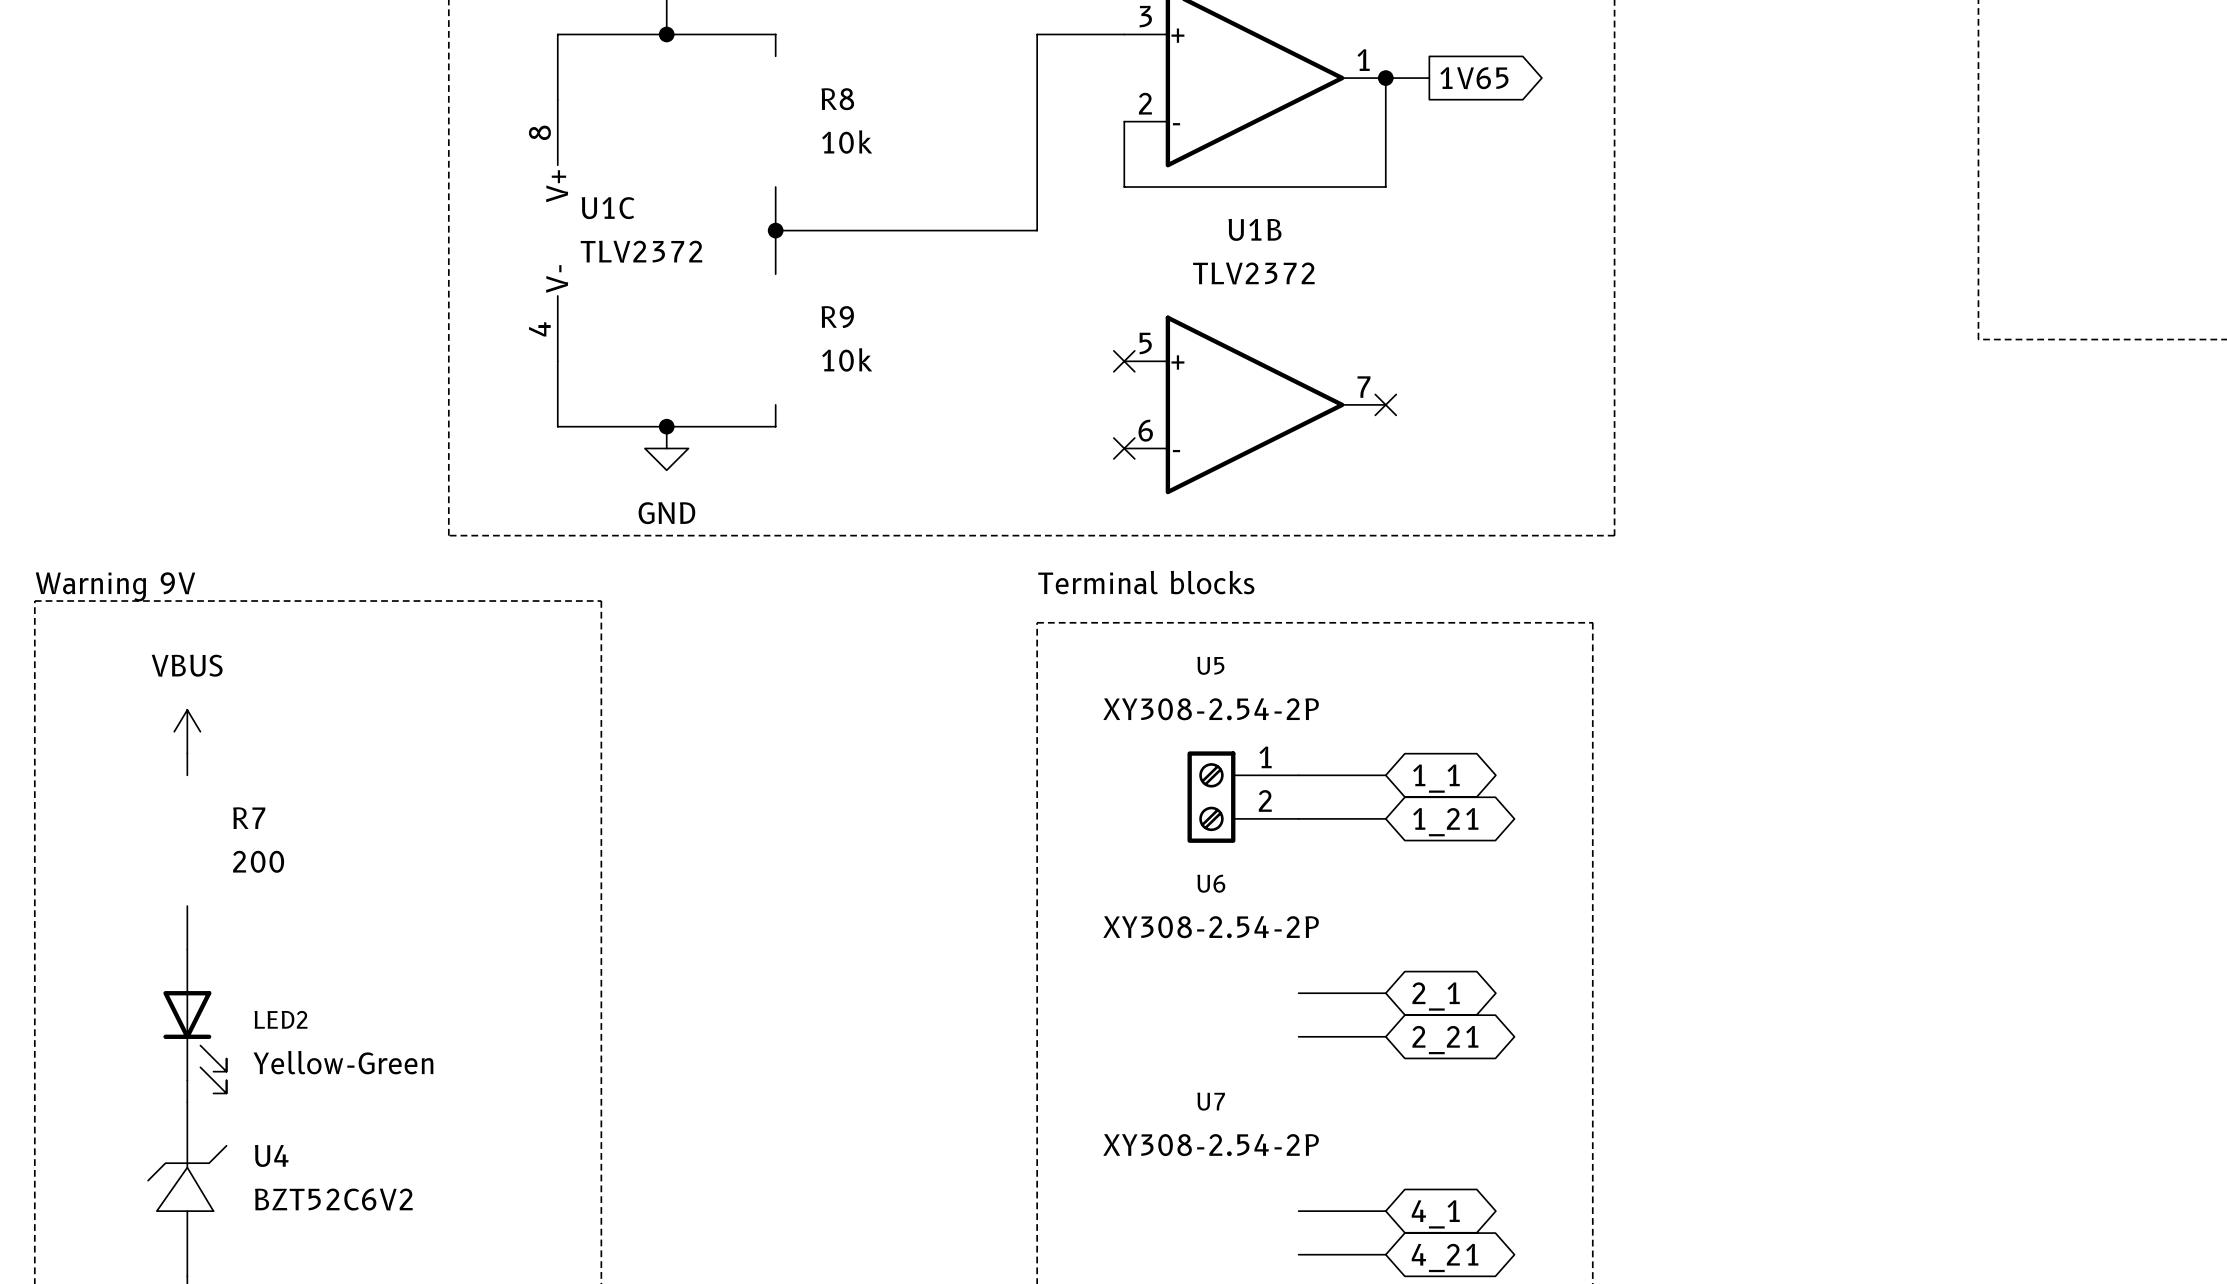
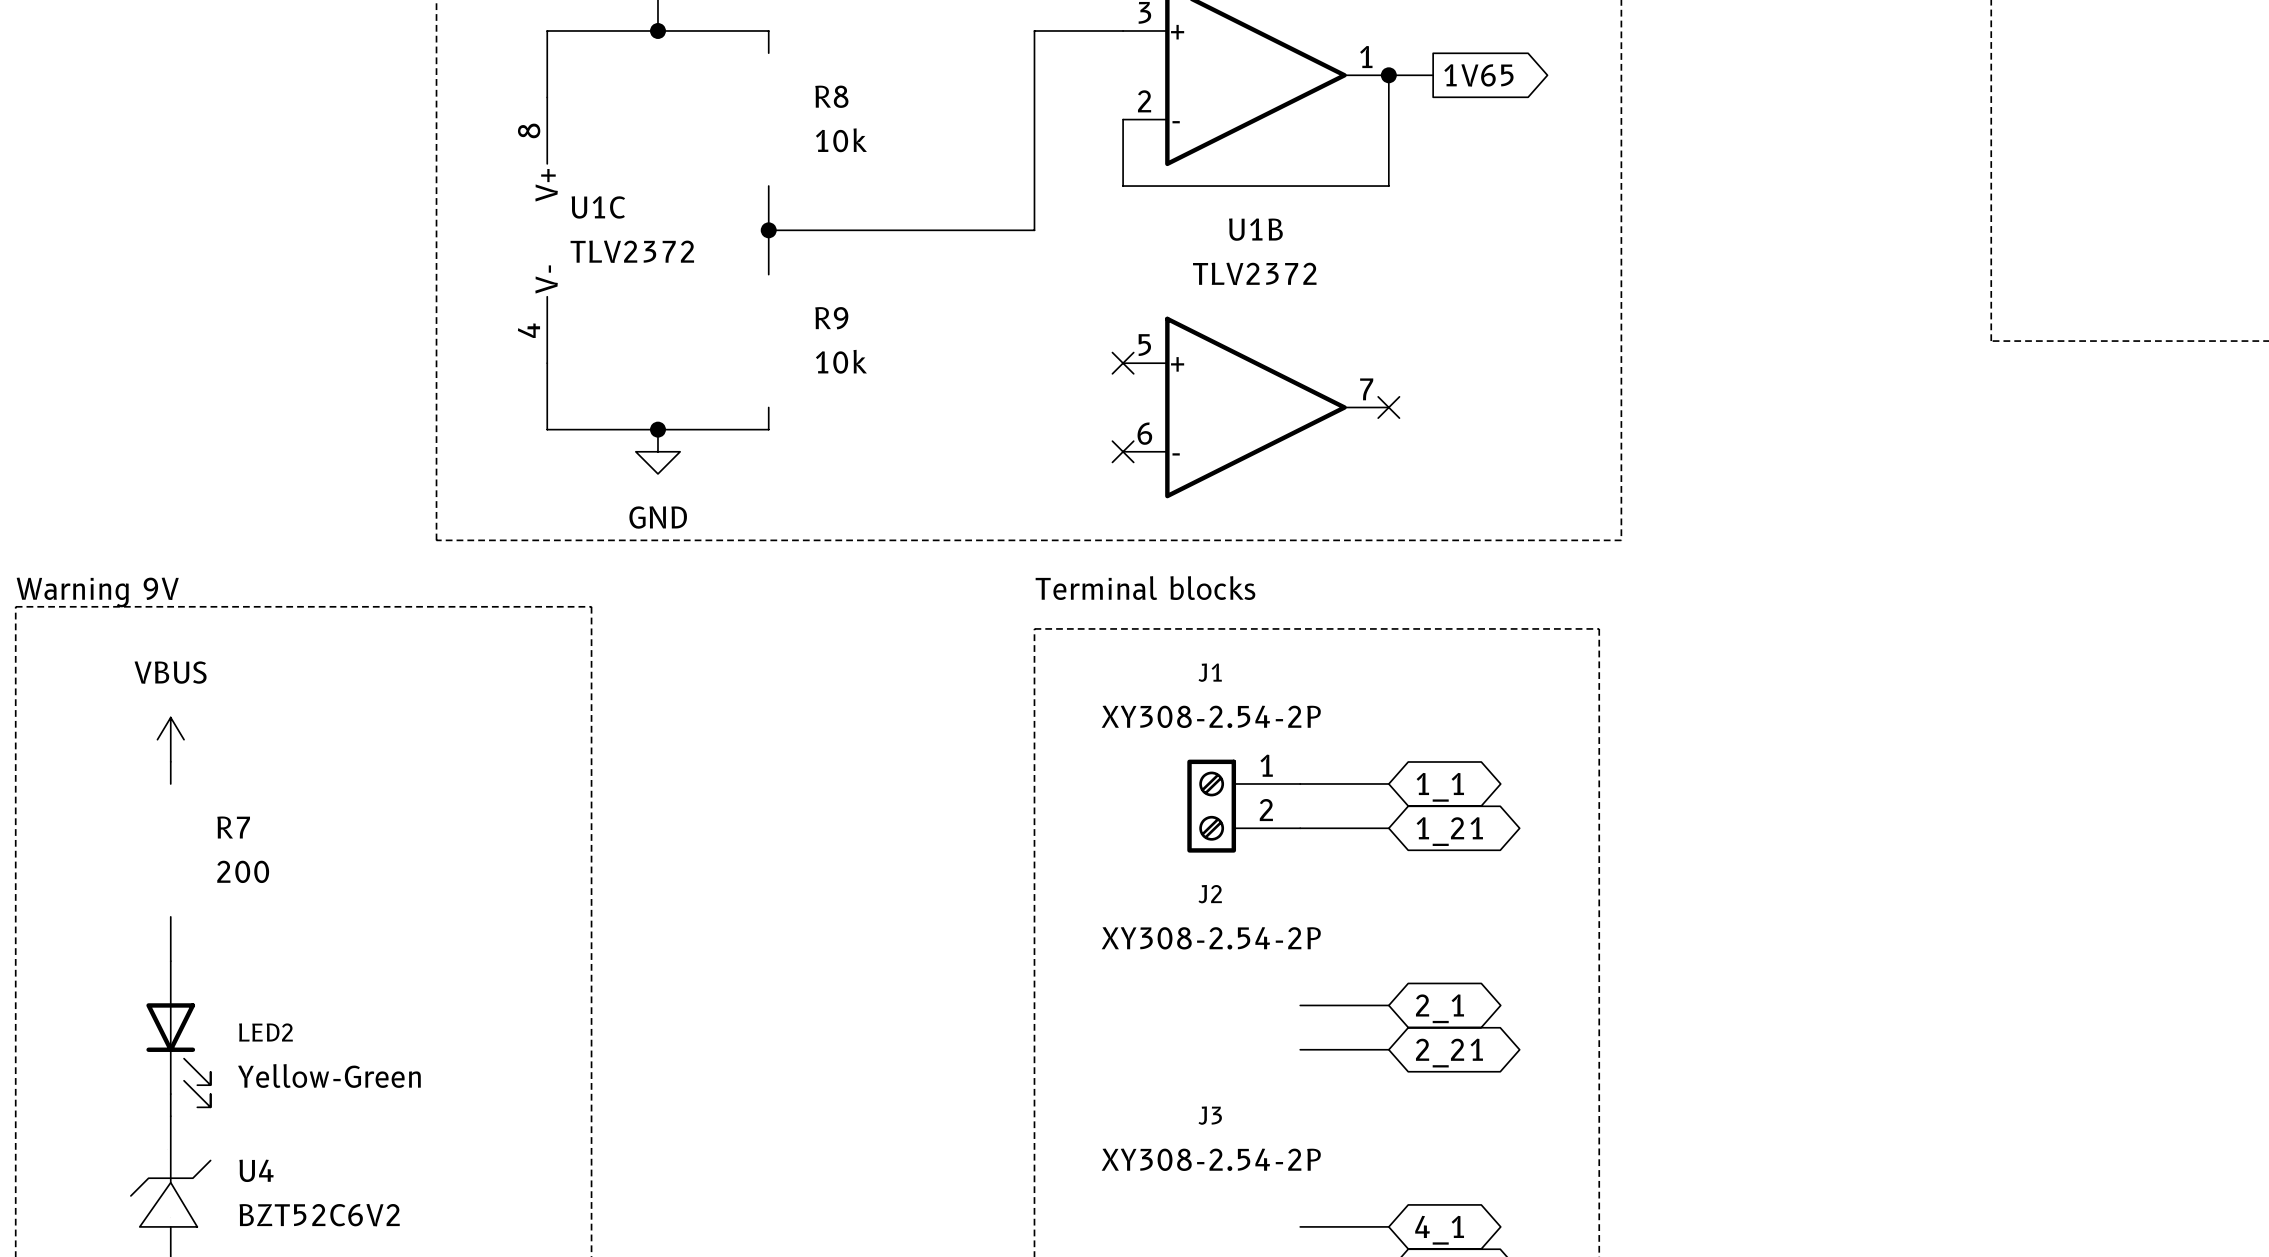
U5 name: U5 (1210, 665) -> J1 (1210, 672)
U6 name: U6 (1211, 883) -> J2 (1210, 894)
U7 name: U7 (1211, 1101) -> J3 (1210, 1115)

